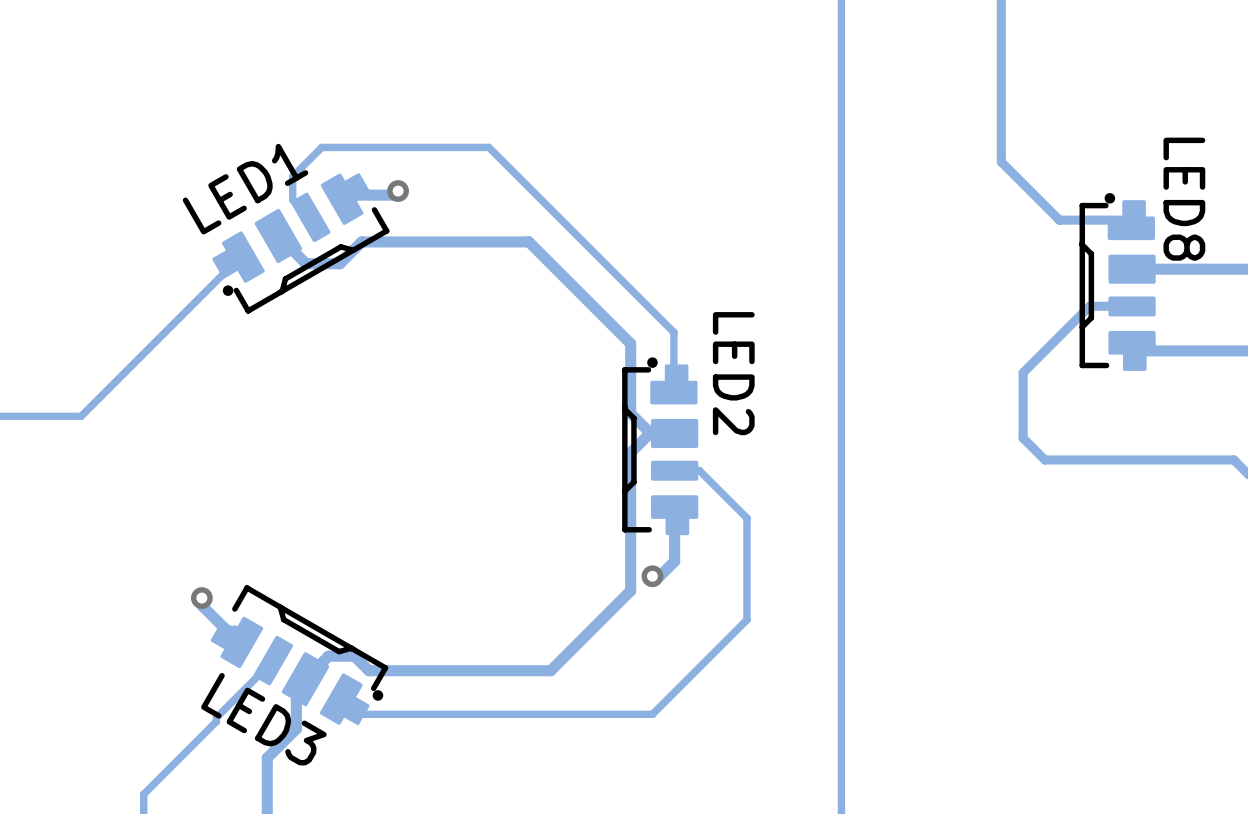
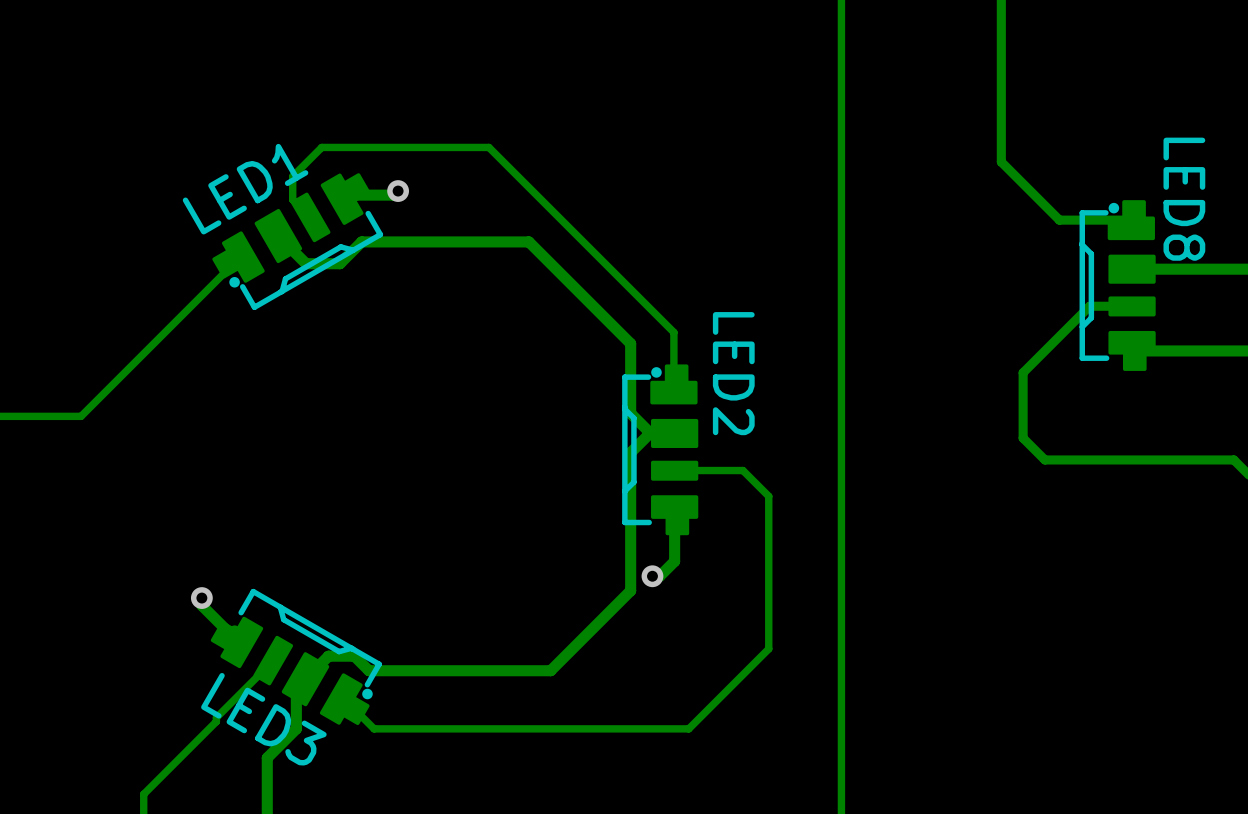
LED1 footprint: [212, 173, 390, 314] -> [212, 173, 384, 311]
LED8 footprint: [1079, 193, 1156, 371] -> [1079, 200, 1156, 371]
LED2 footprint: [622, 357, 699, 536] -> [622, 364, 699, 536]
track: (699, 470) (746, 518) (746, 619) (652, 714) (359, 714) -> (699, 470) (742, 470) (768, 496) (768, 648) (688, 728) (374, 728) (359, 714)
LED3 footprint: [210, 585, 389, 726] -> [210, 588, 382, 726]

